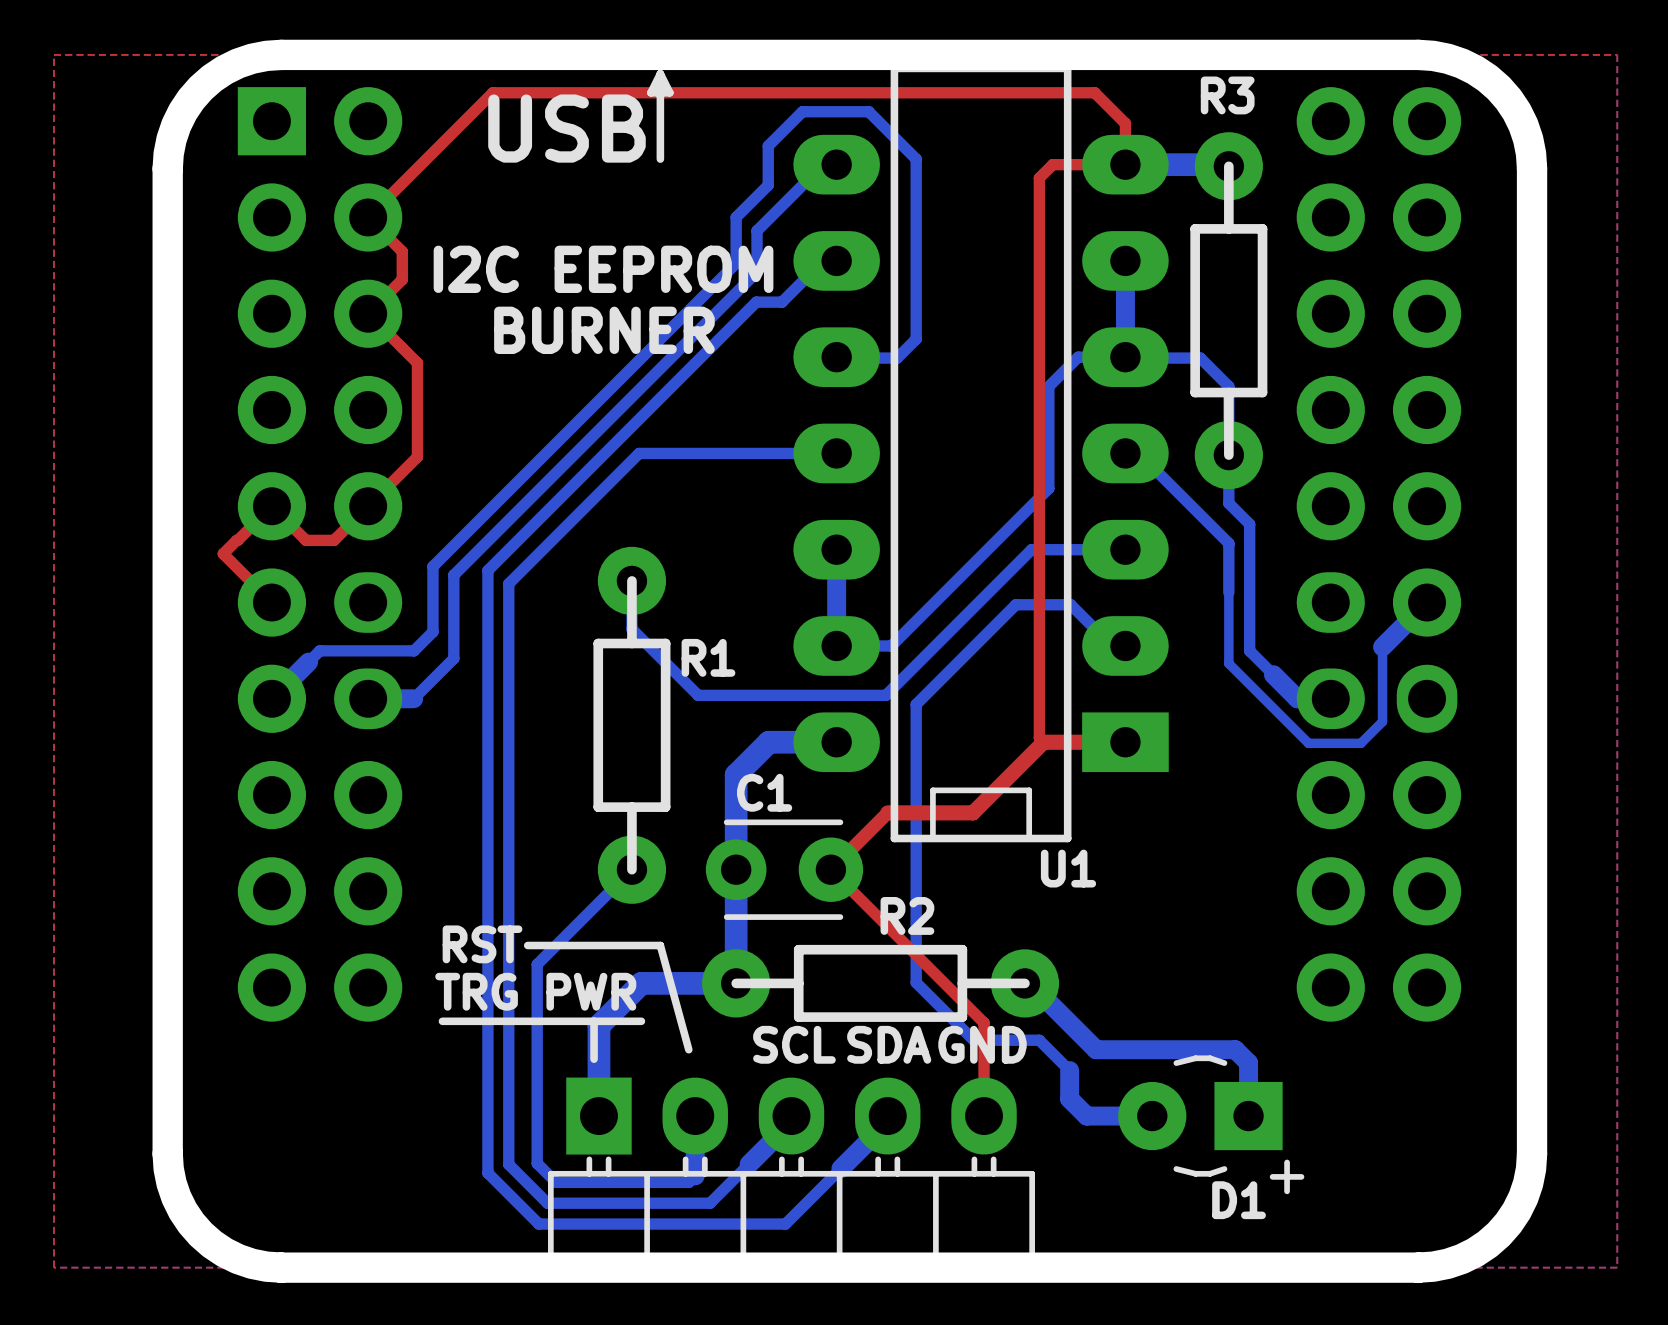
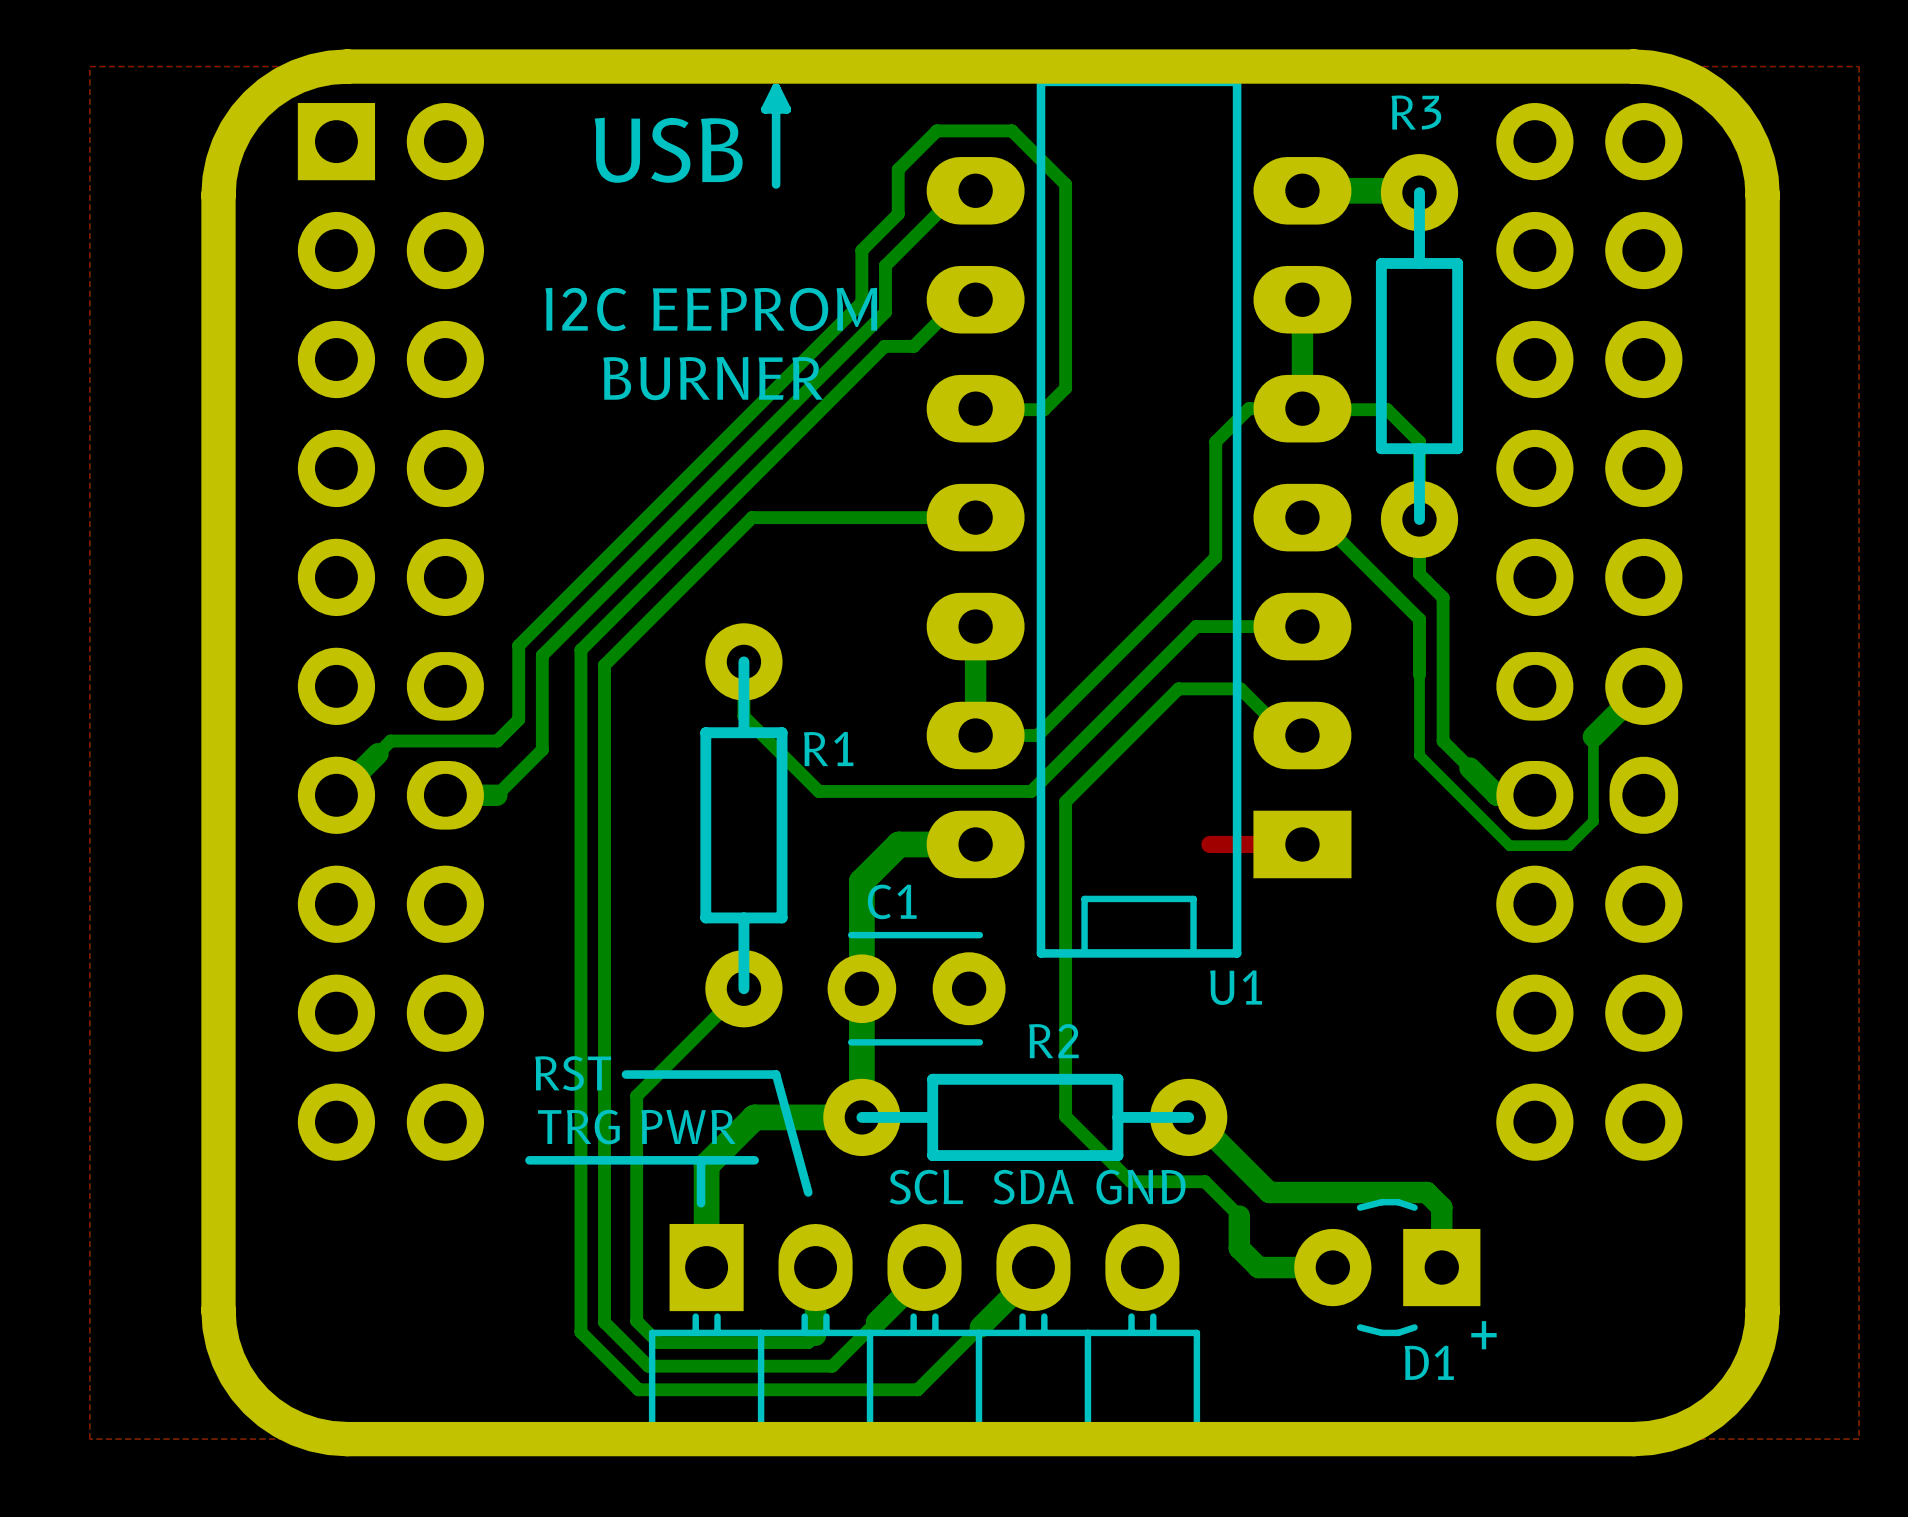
top track: (271, 602) (223, 553) (271, 506) (306, 540) (334, 540) (417, 456) (417, 363) (368, 313) (402, 279) (402, 251) (368, 217) (492, 92) (1094, 92) (1125, 123) (1125, 164) (1052, 164) (1039, 178) (1039, 737) (1043, 742) (973, 812) (887, 812) (830, 869) (984, 1022) (984, 1116) -> none

